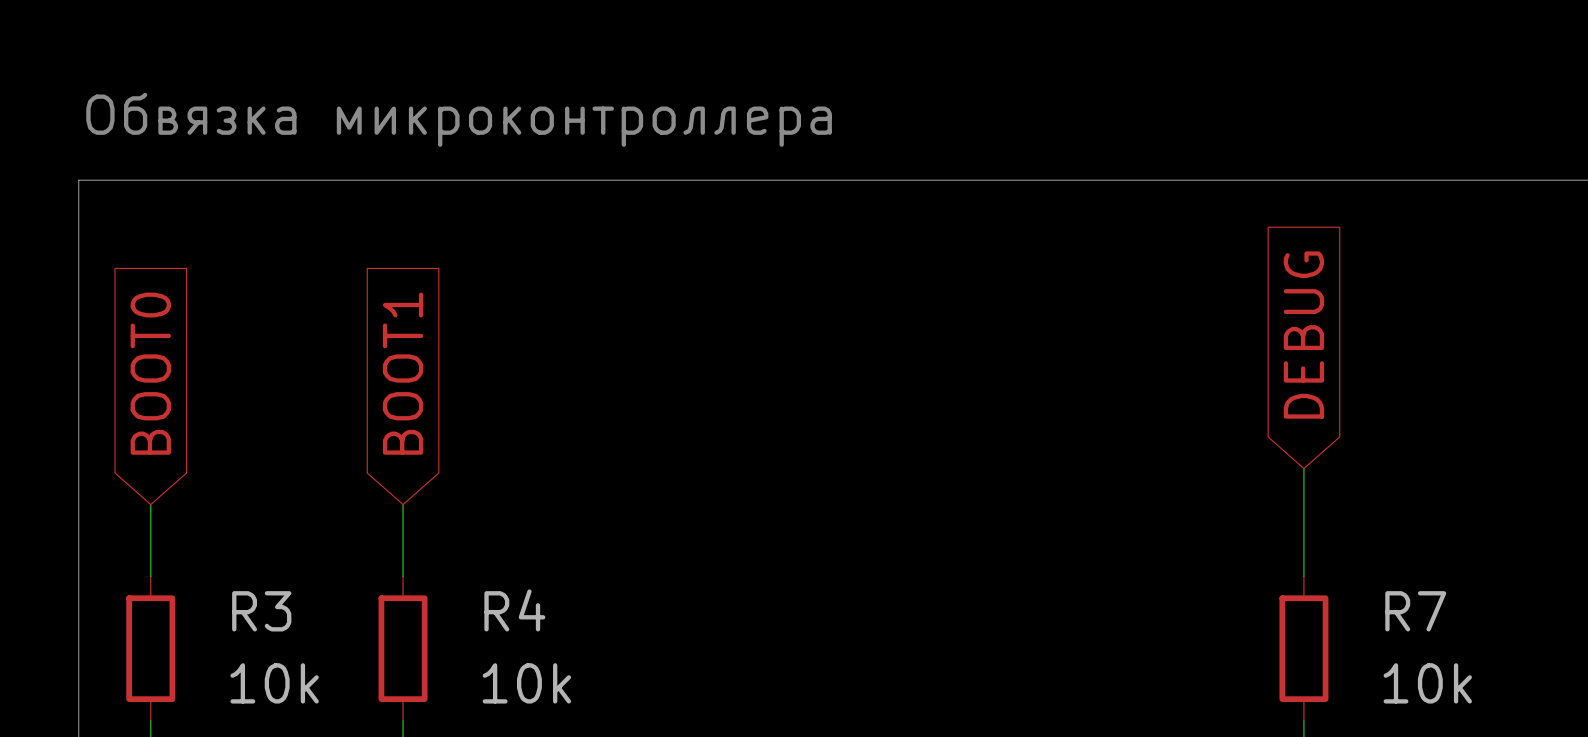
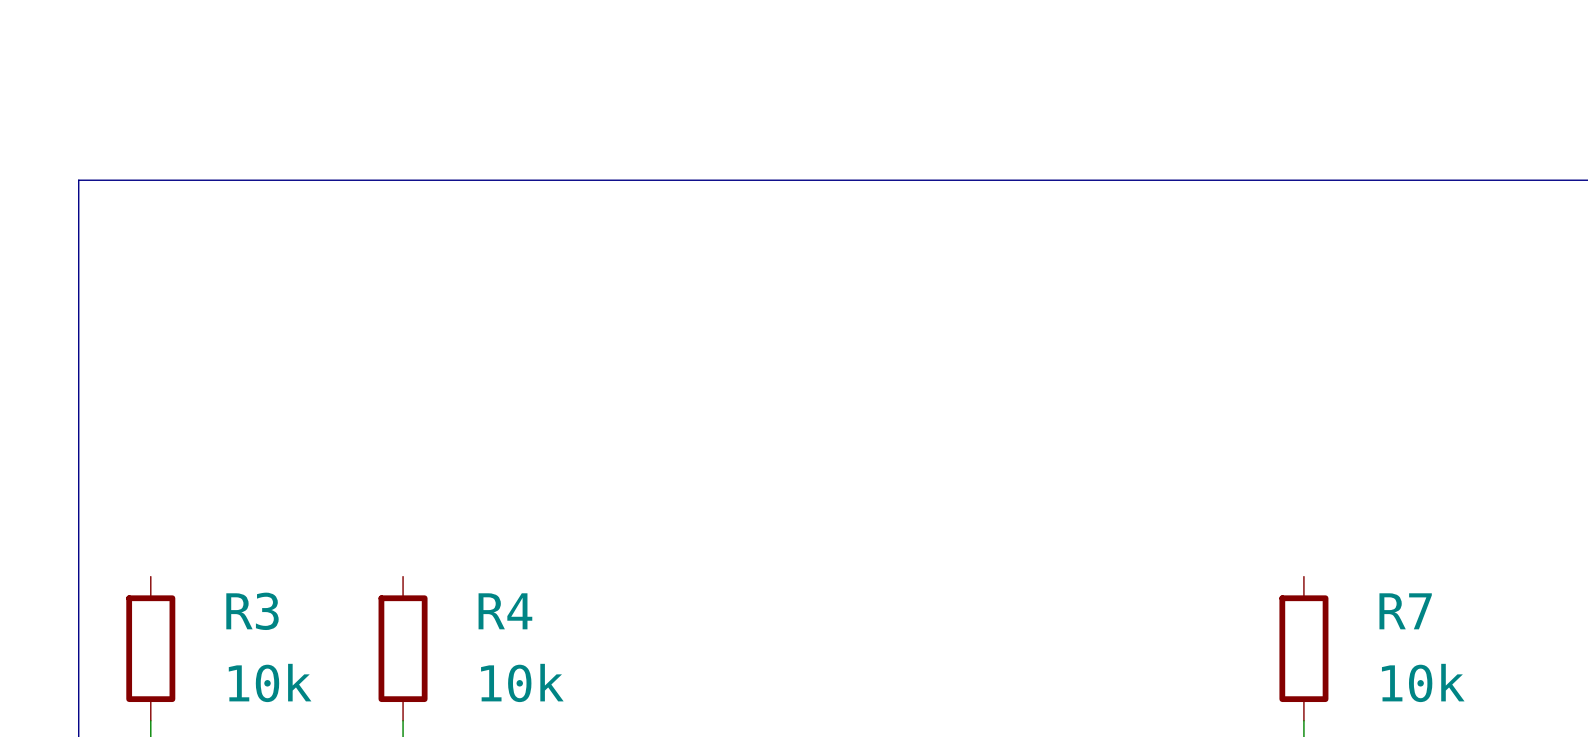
text: Обвязка микроконтроллера (459, 119) -> none
global label: DEBUG (1303, 335) -> none
global label: BOOT0 (150, 373) -> none
global label: BOOT1 (403, 373) -> none
wire: (1303, 468) (1303, 576) -> none
wire: (150, 504) (150, 576) -> none
wire: (403, 504) (403, 576) -> none

